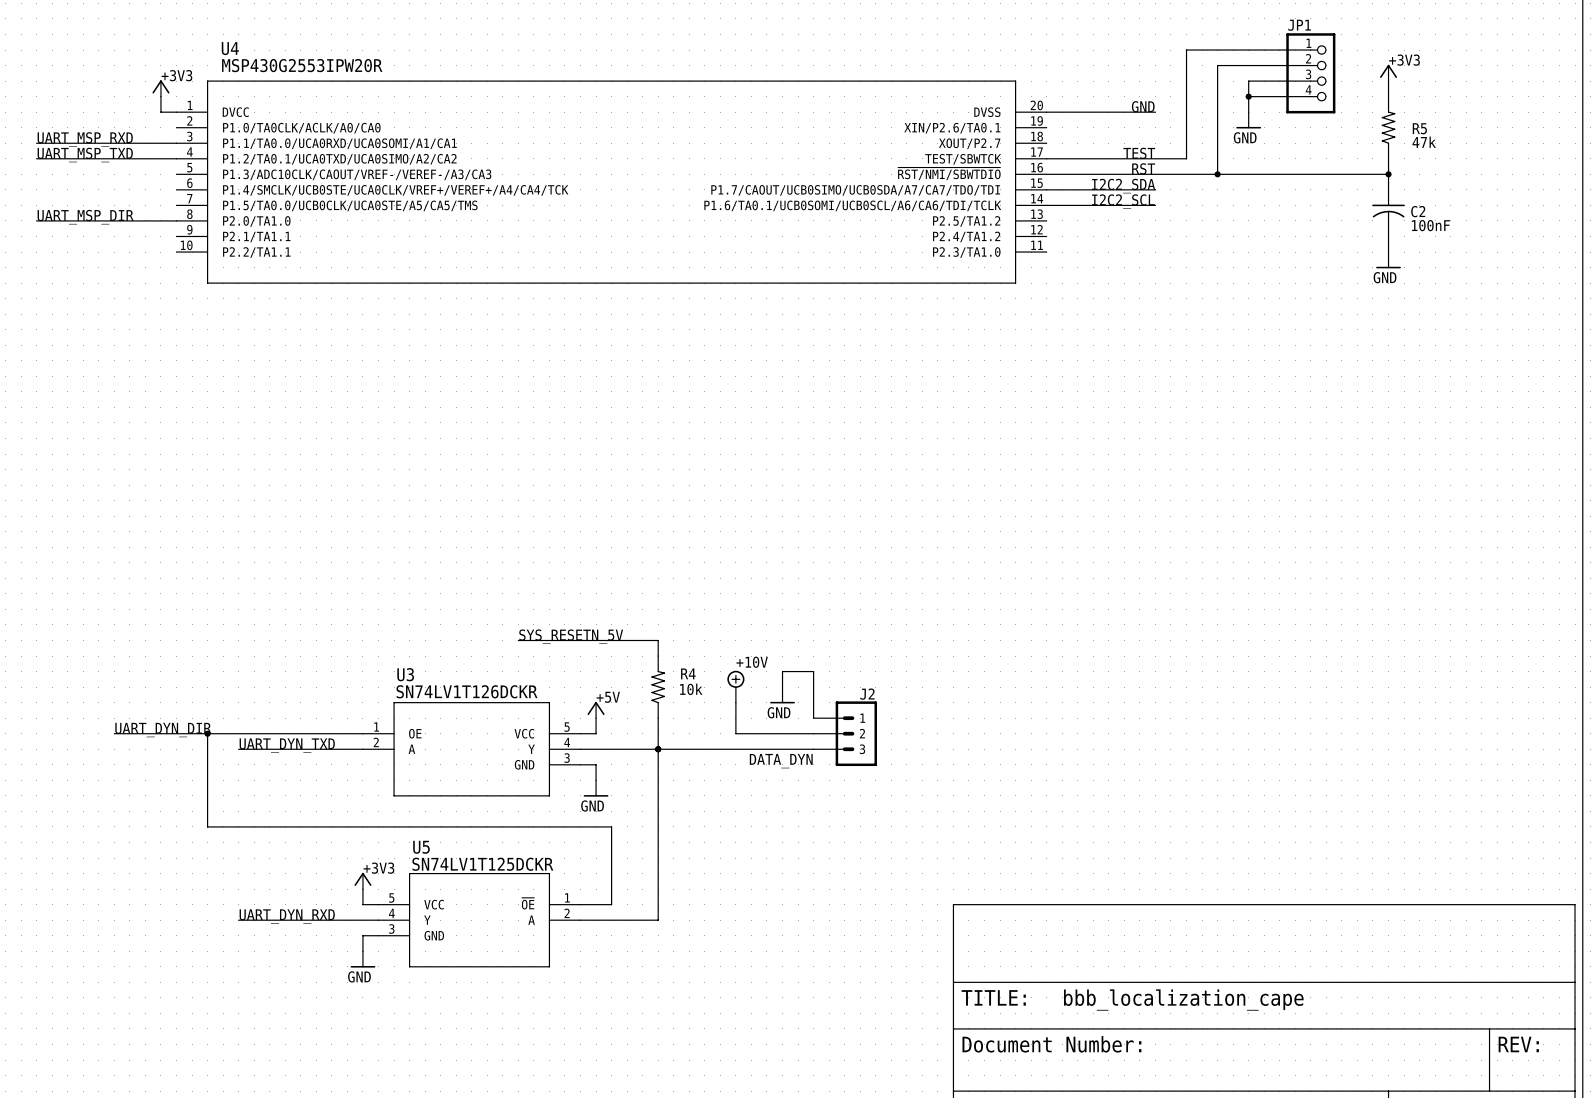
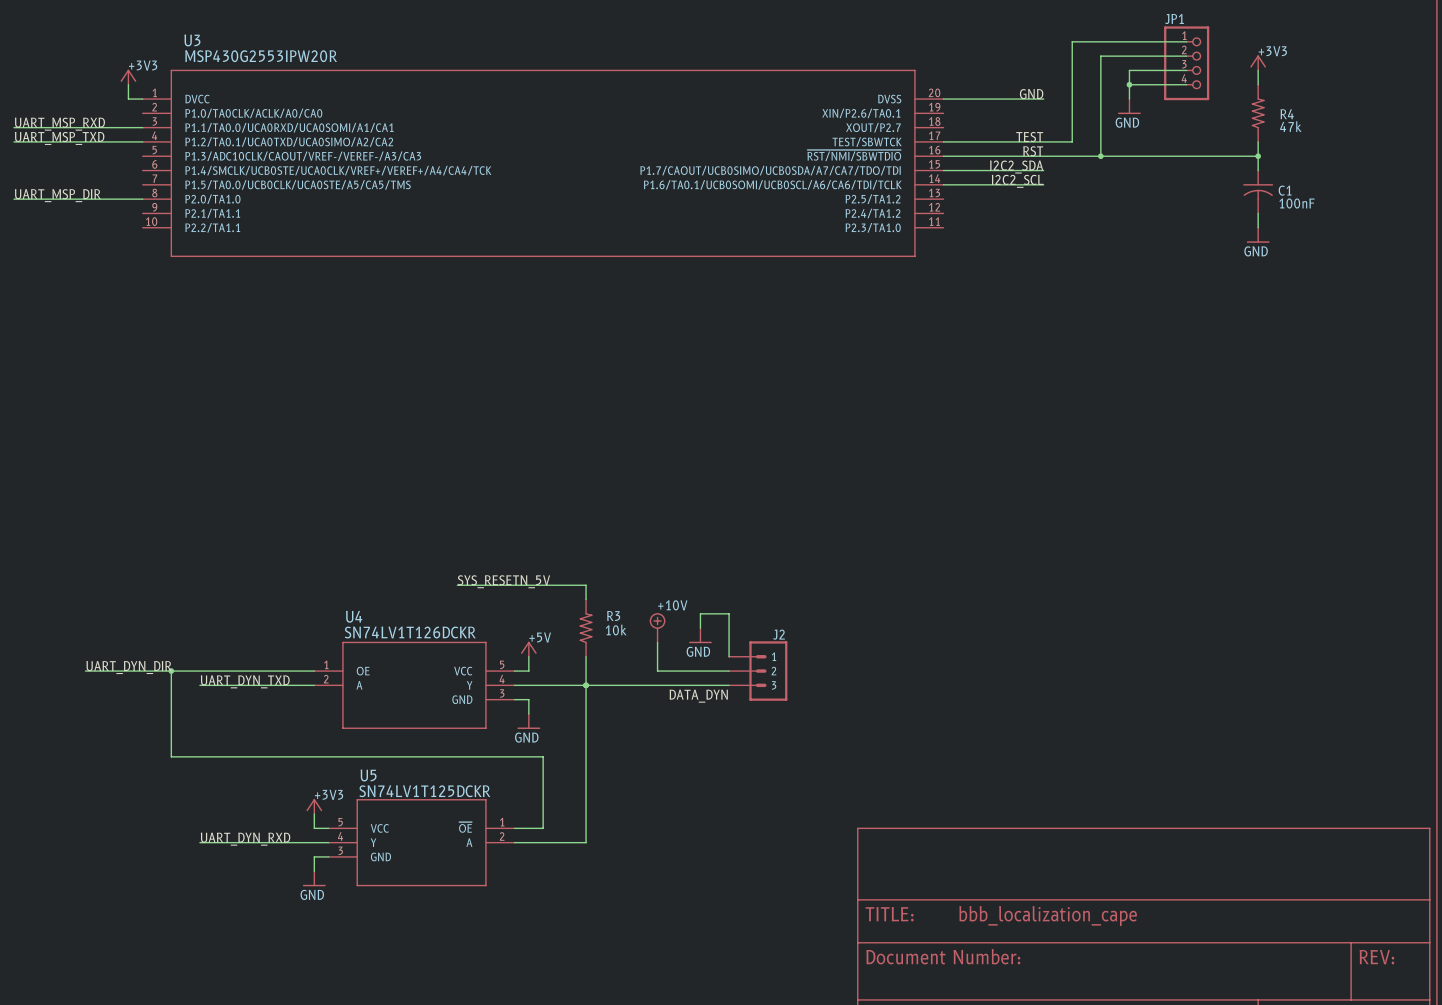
U4 name: U4 (230, 48) -> U3 (192, 40)
R5 name: R5 (1419, 128) -> R4 (1287, 114)
C2 name: C2 (1418, 211) -> C1 (1285, 190)
R4 name: R4 (688, 673) -> R3 (613, 616)
U3 name: U3 (405, 674) -> U4 (354, 616)

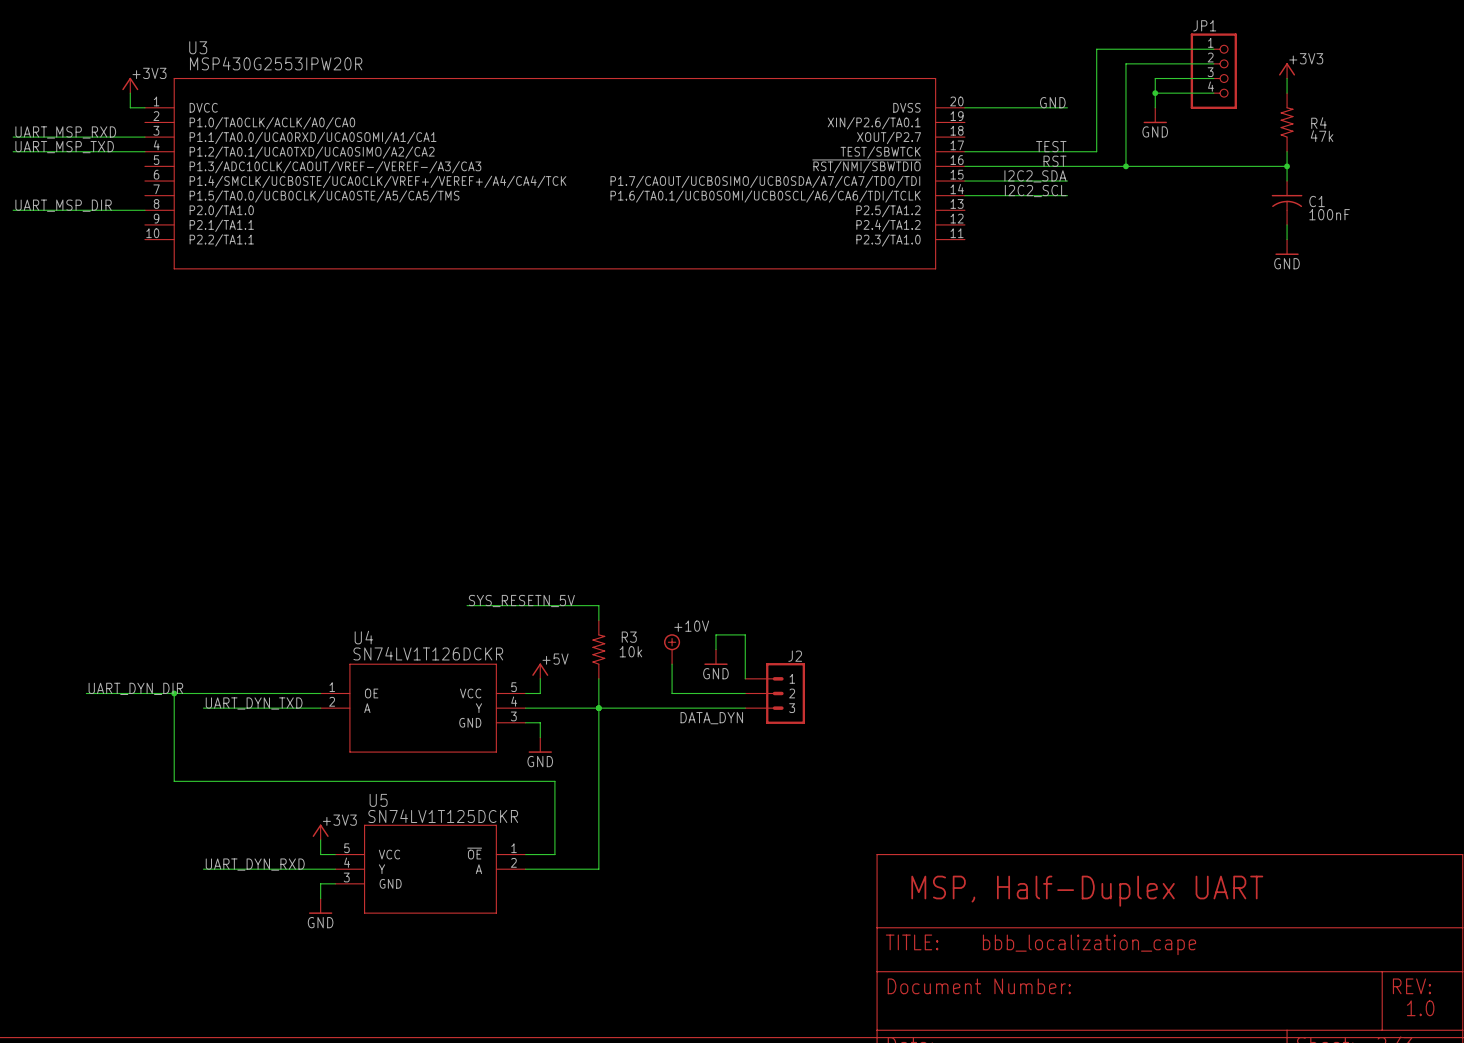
text: none -> MSP, Half-Duplex UART (1087, 891)
text: none -> 1.0 (1420, 1008)

